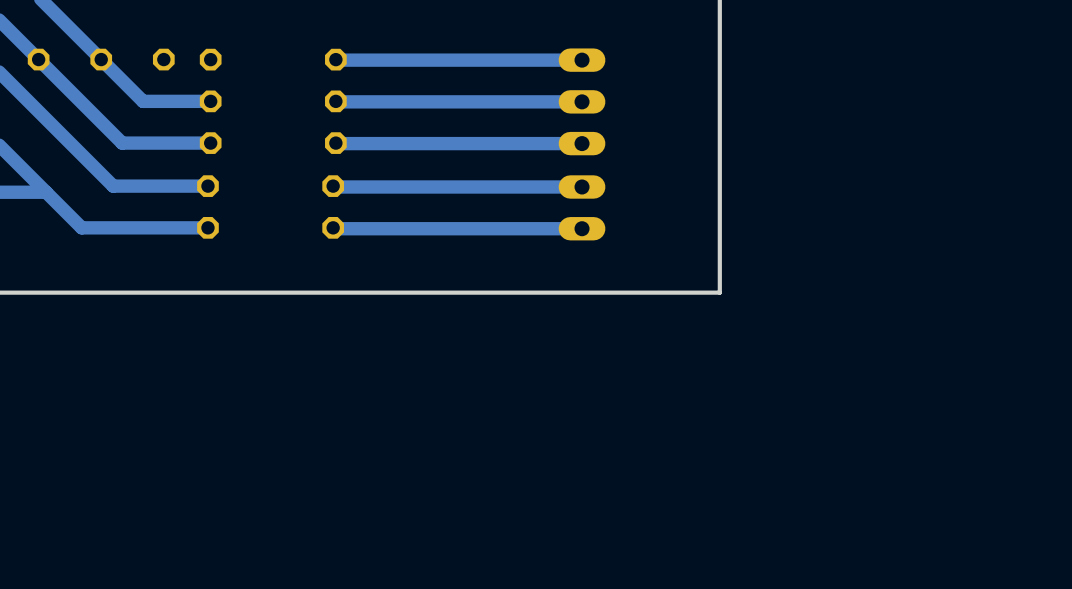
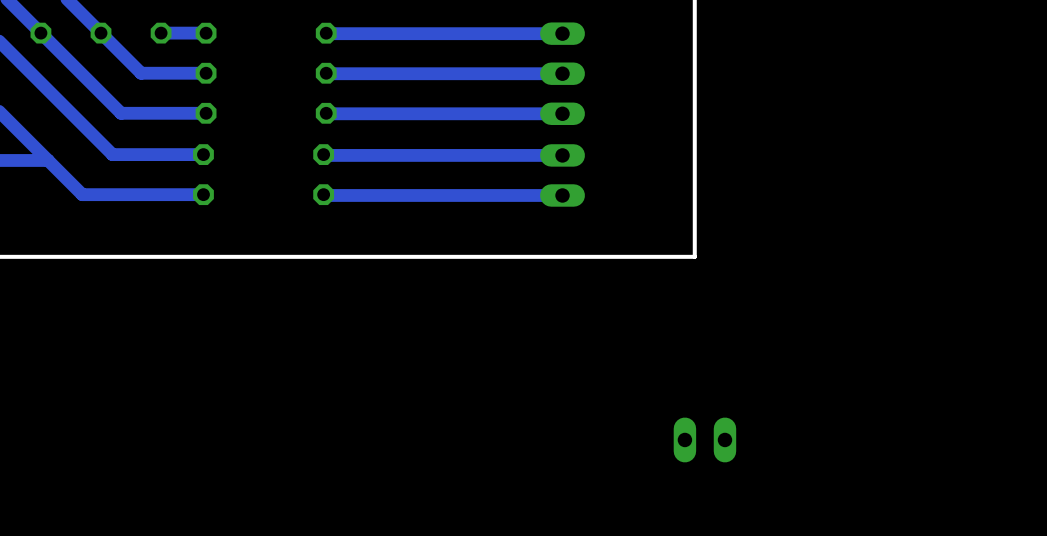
bottom track: none -> (206, 33) (161, 33)
part: none -> (704, 439)

